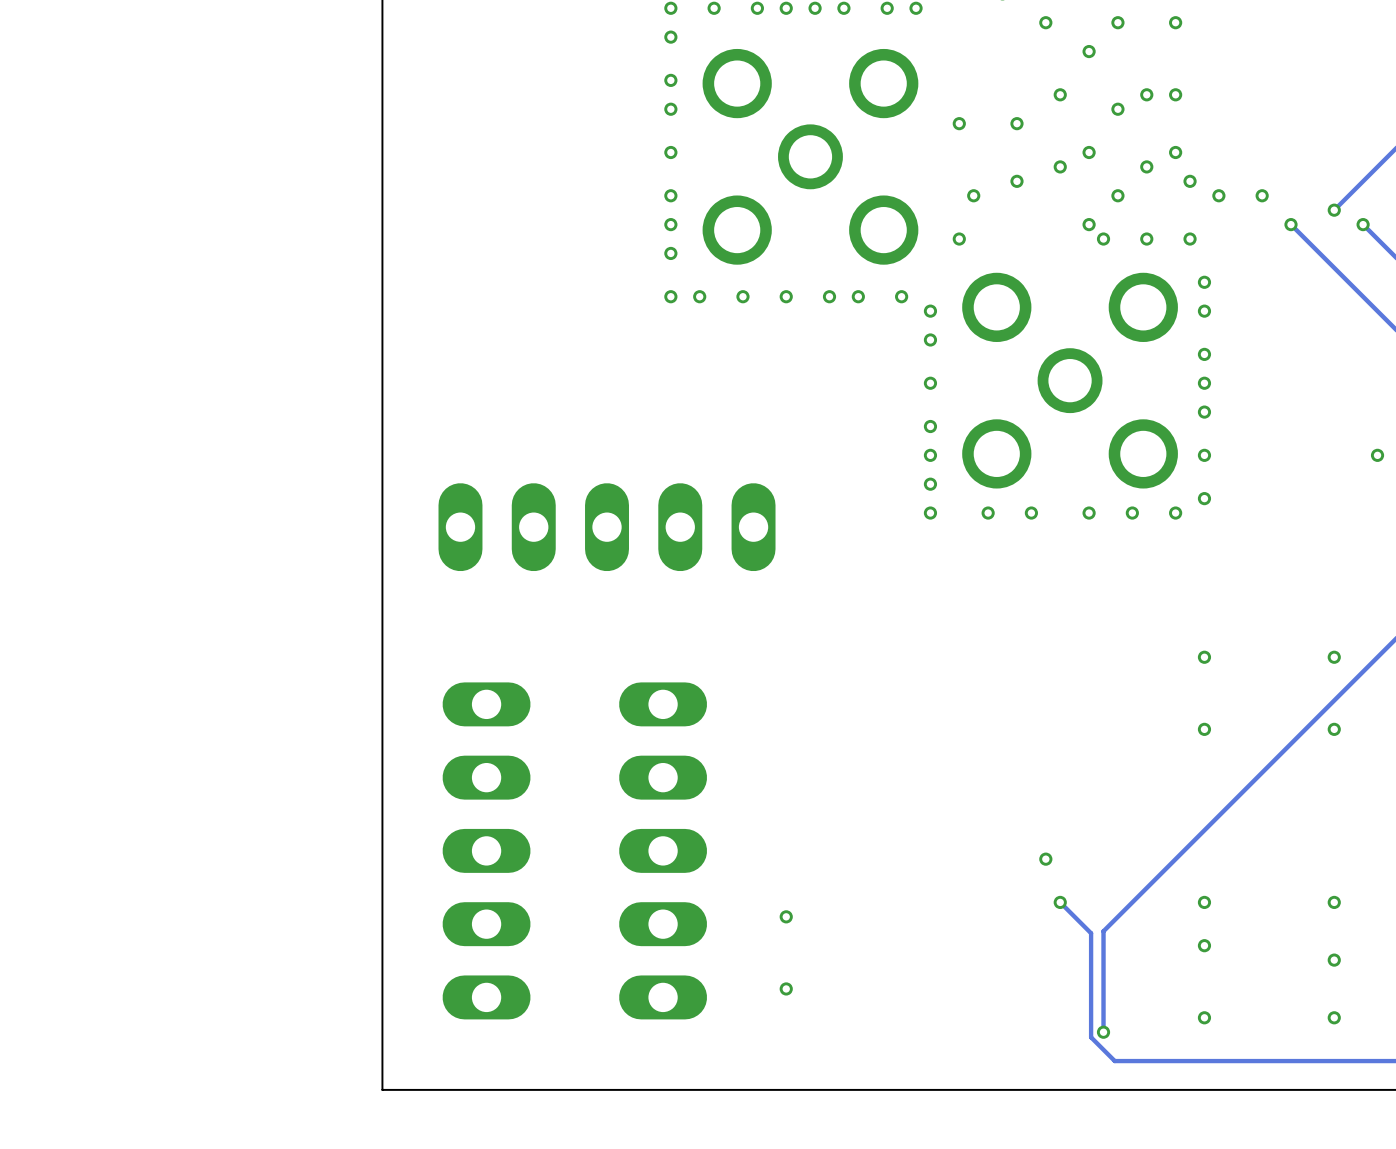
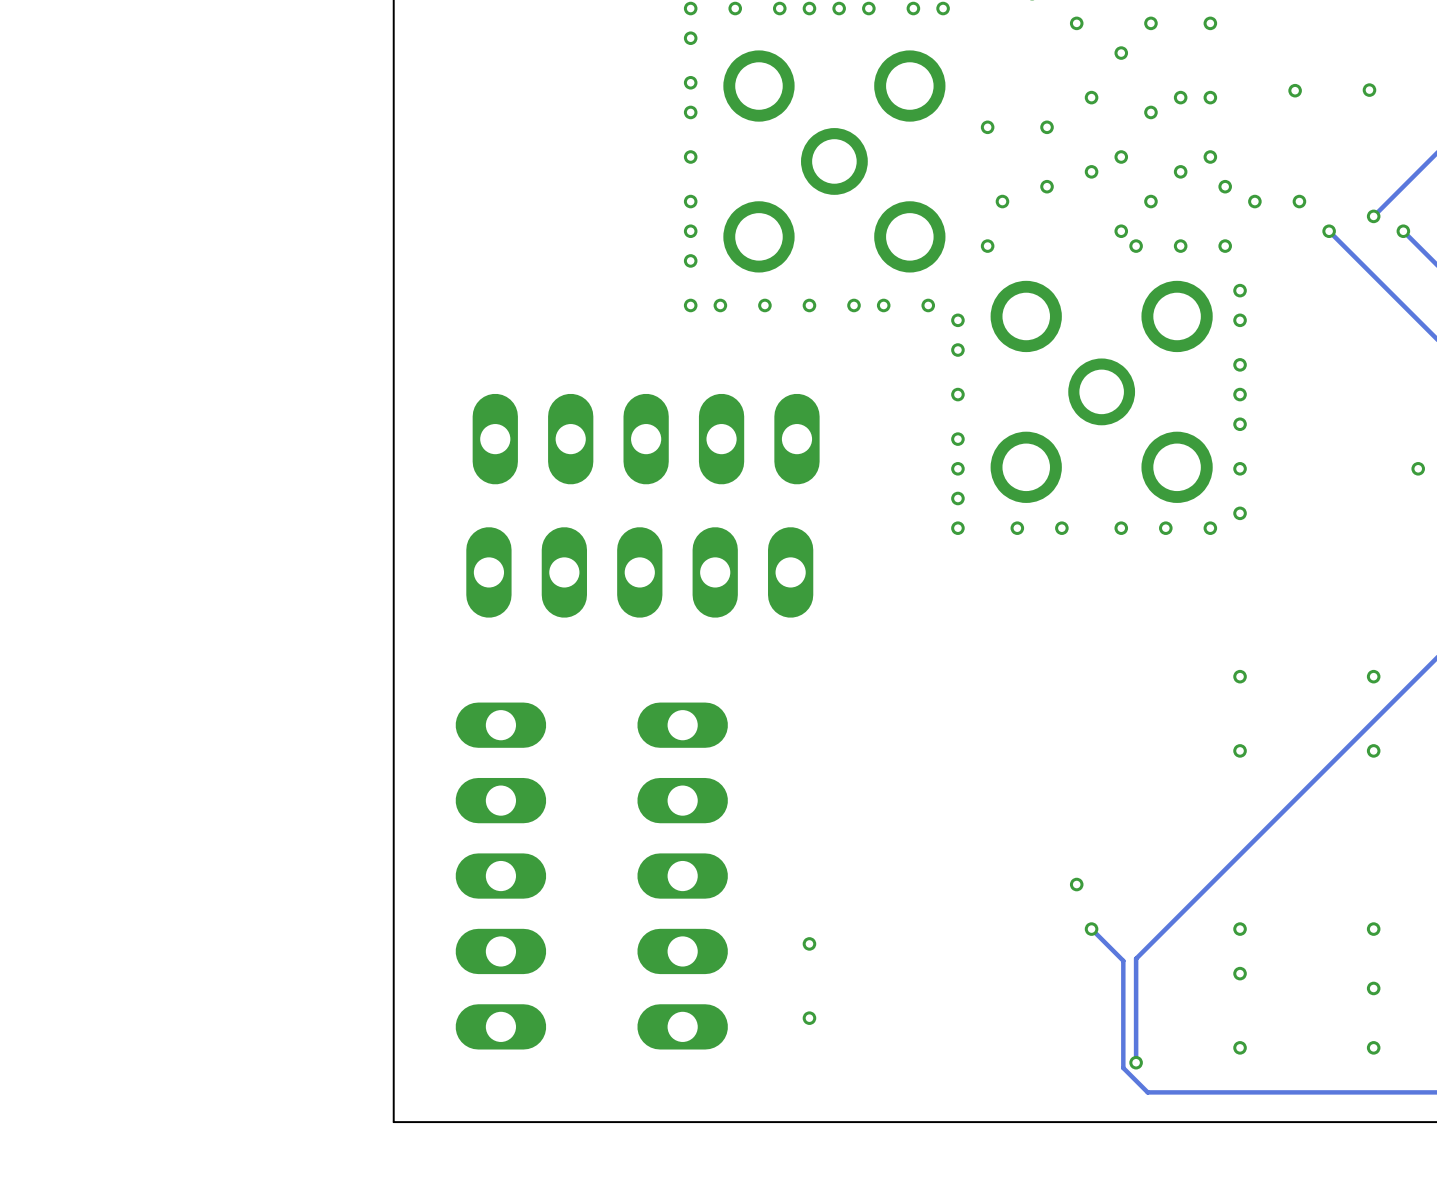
via: none -> (1369, 90)
via: none -> (1295, 90)
part: none -> (646, 439)
part position: (607, 527) -> (639, 572)

